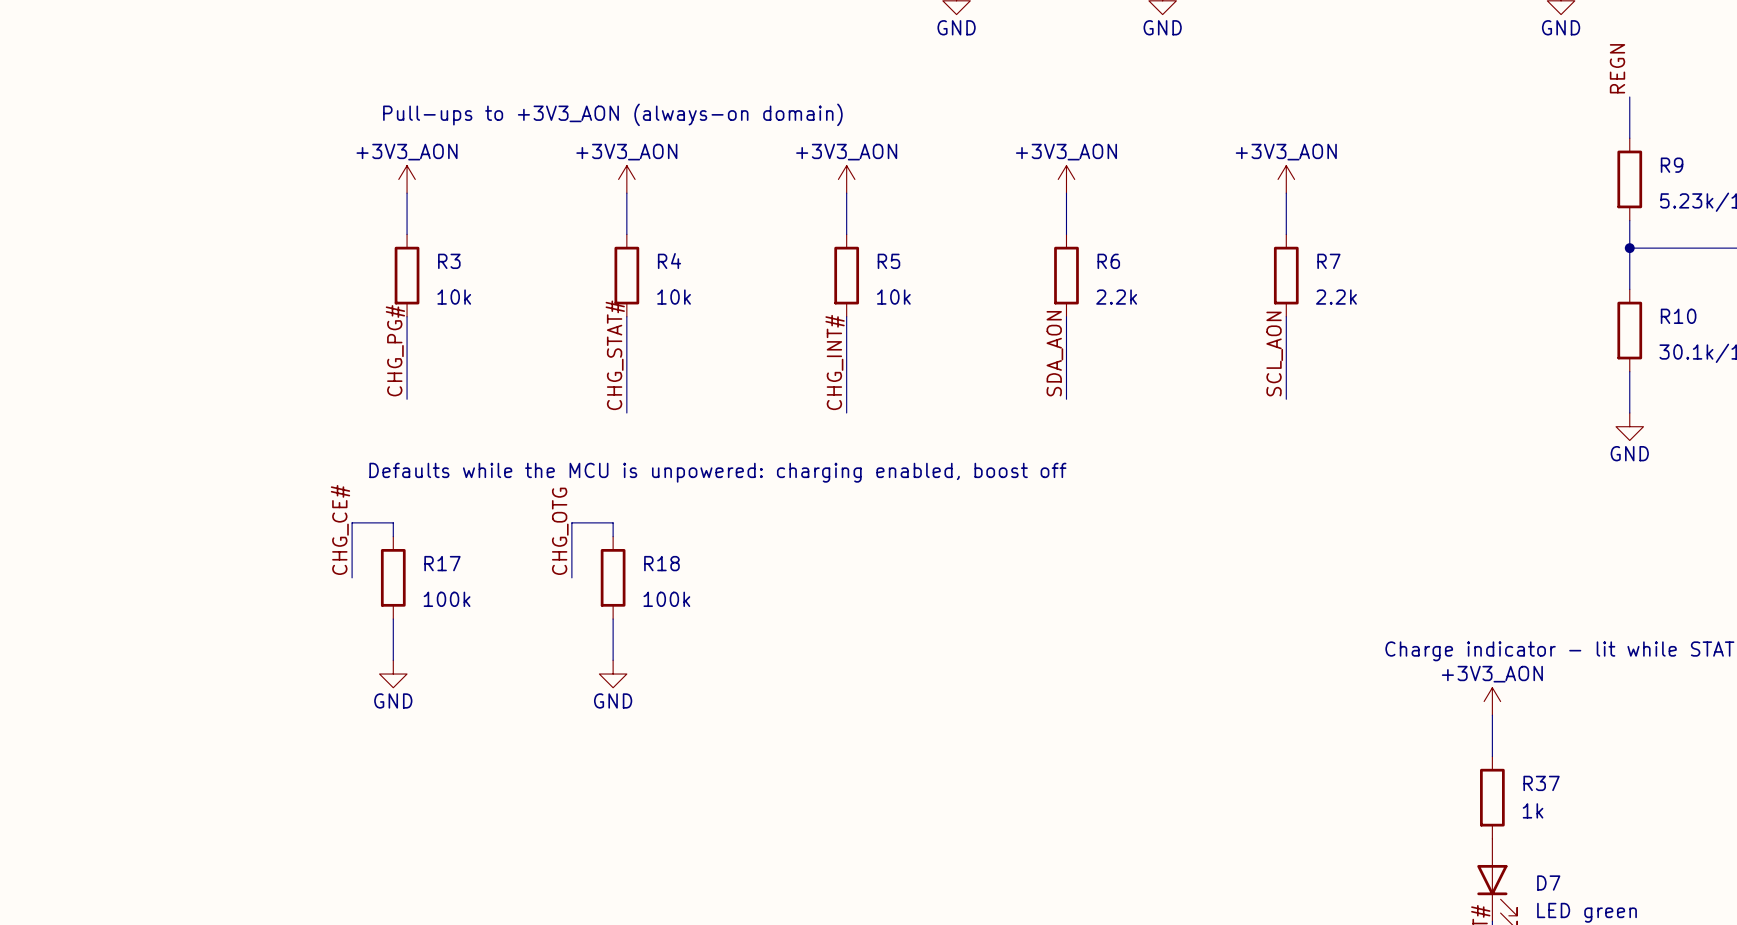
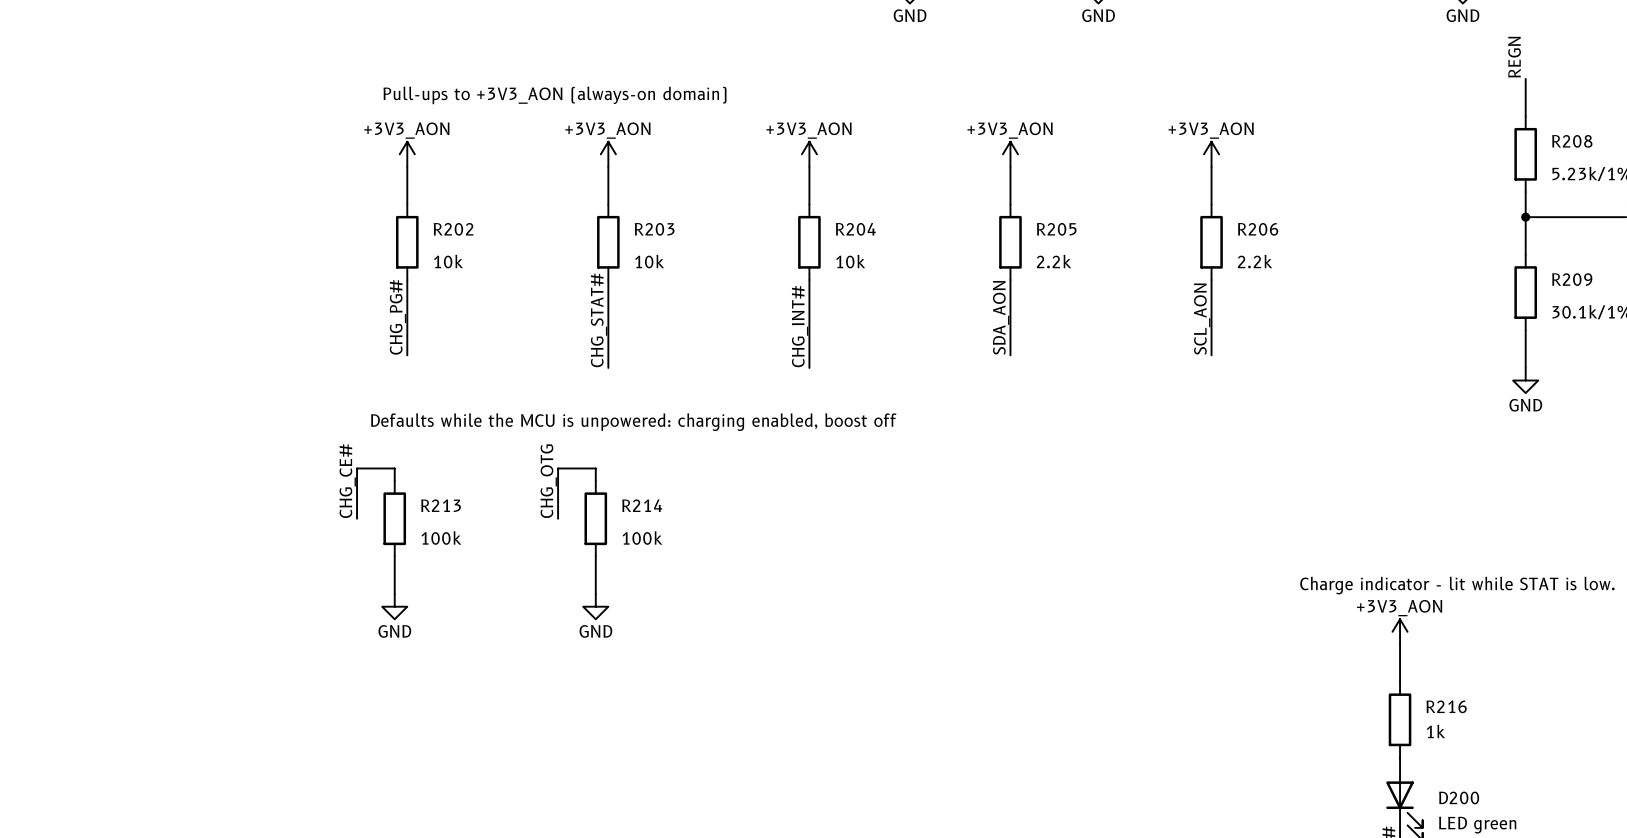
R9 name: R9 (1672, 165) -> R208 (1572, 141)
R3 name: R3 (449, 261) -> R202 (453, 229)
R4 name: R4 (669, 261) -> R203 (654, 229)
R5 name: R5 (888, 261) -> R204 (855, 229)
R6 name: R6 (1108, 261) -> R205 (1056, 229)
R7 name: R7 (1328, 261) -> R206 (1258, 229)
R10 name: R10 (1678, 316) -> R209 (1572, 279)
R17 name: R17 (442, 563) -> R213 (441, 505)
R18 name: R18 (661, 563) -> R214 (642, 505)
R37 name: R37 (1541, 783) -> R216 (1446, 706)
D7 name: D7 (1548, 883) -> D200 (1459, 797)

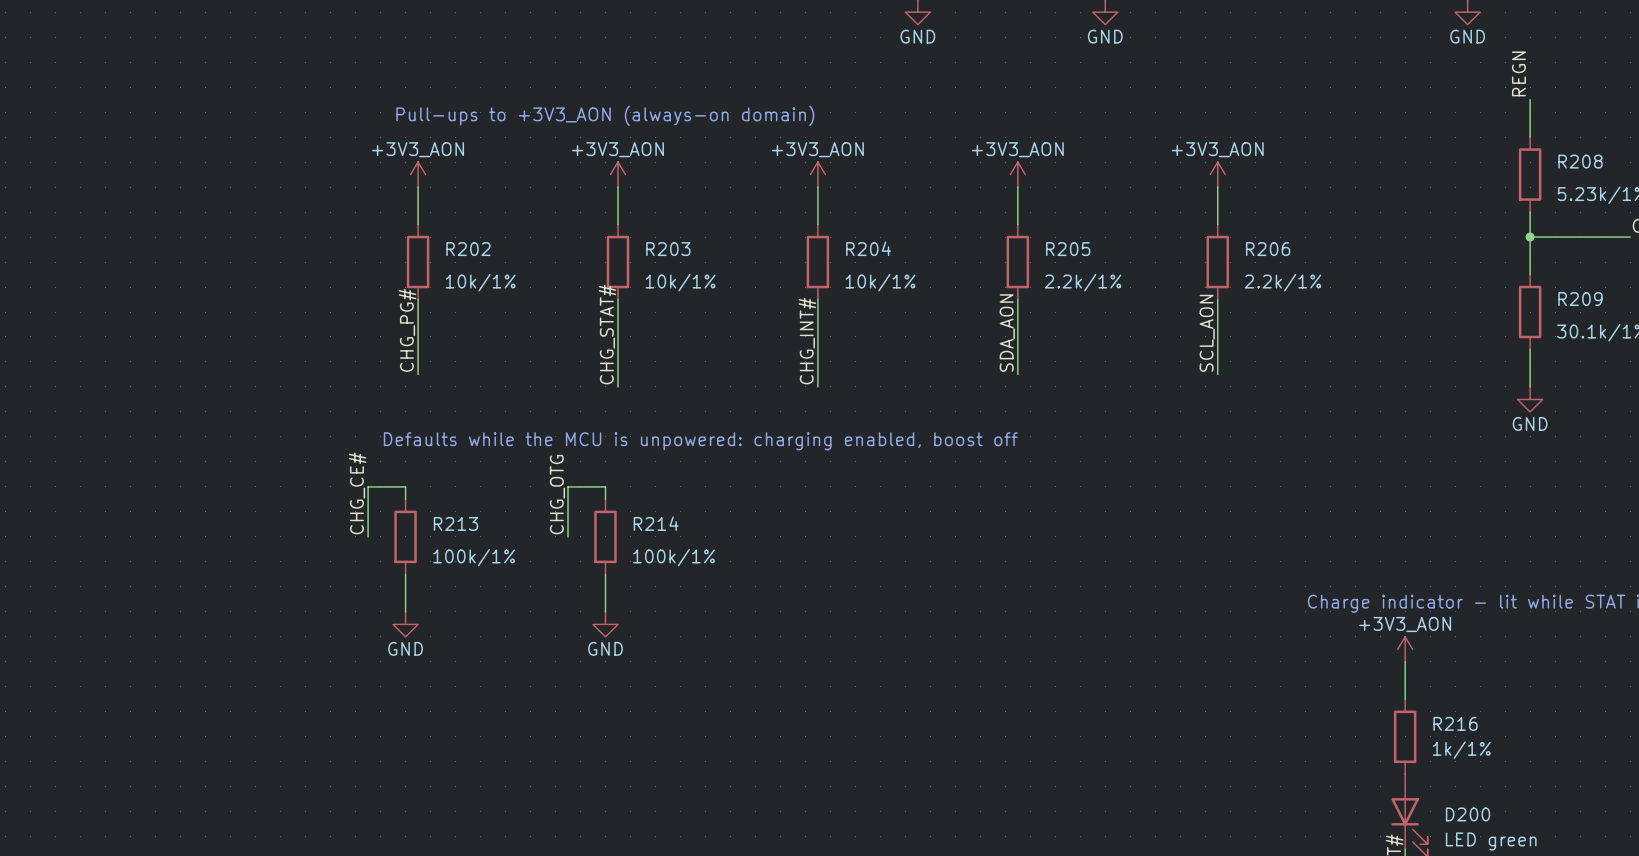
R202 value: 10k (448, 261) -> 10k/1% (480, 282)
R203 value: 10k (649, 261) -> 10k/1% (680, 282)
R204 value: 10k (850, 261) -> 10k/1% (880, 282)
R205 value: 2.2k (1054, 261) -> 2.2k/1% (1083, 282)
R206 value: 2.2k (1255, 261) -> 2.2k/1% (1282, 282)
R213 value: 100k (441, 538) -> 100k/1% (474, 557)
R214 value: 100k (642, 538) -> 100k/1% (674, 557)
R216 value: 1k (1435, 731) -> 1k/1% (1461, 750)

